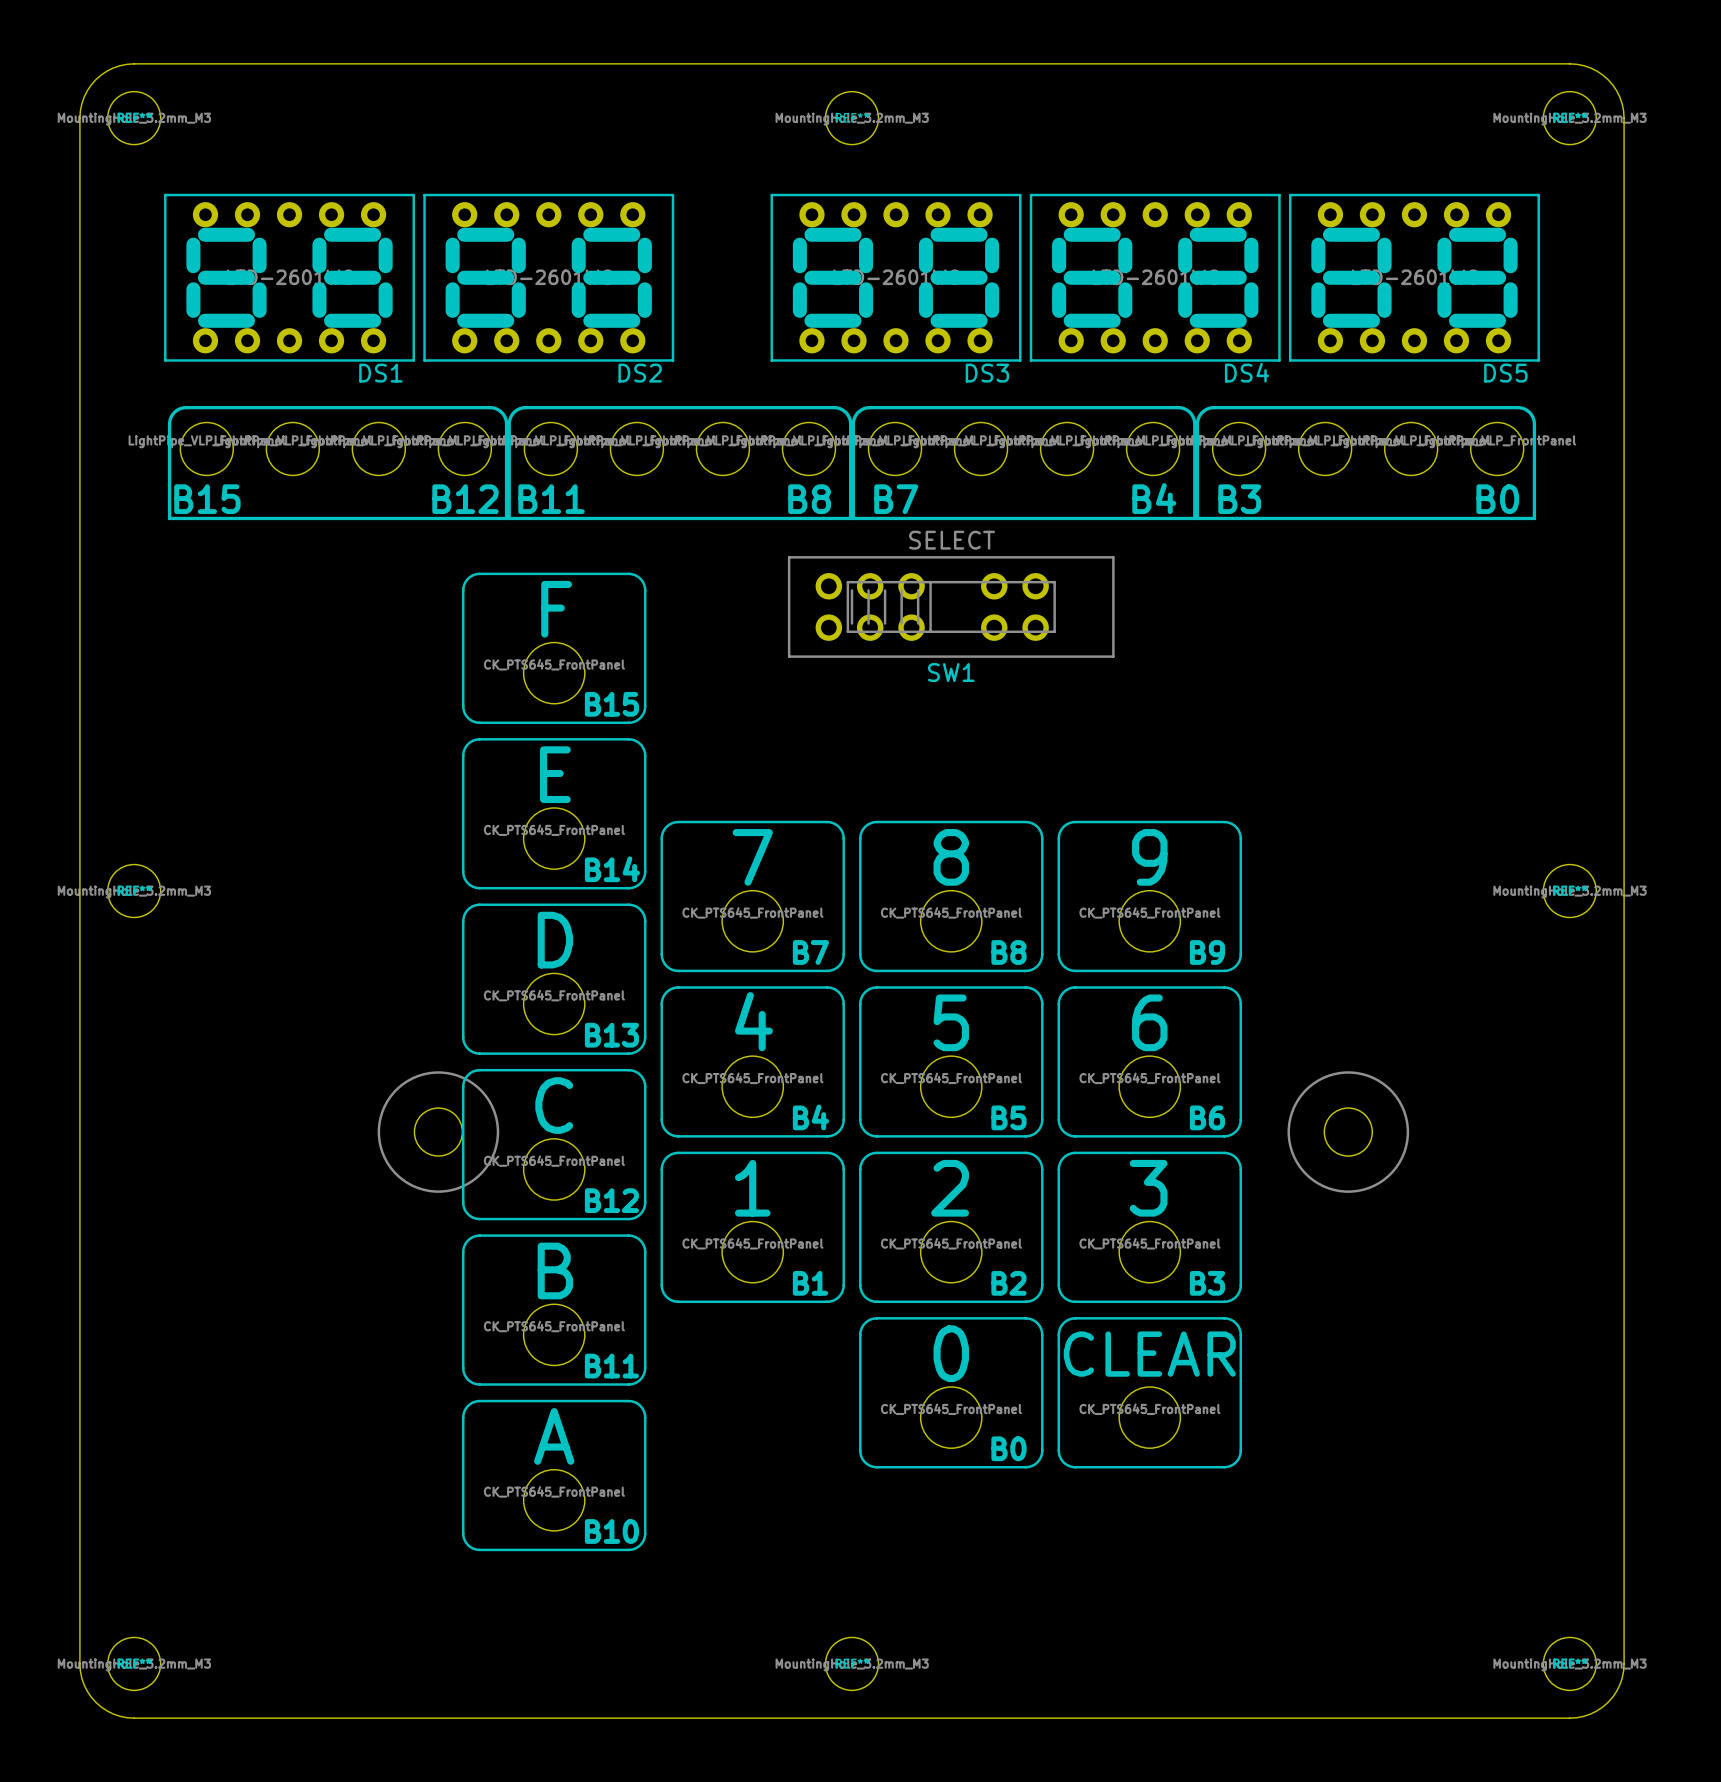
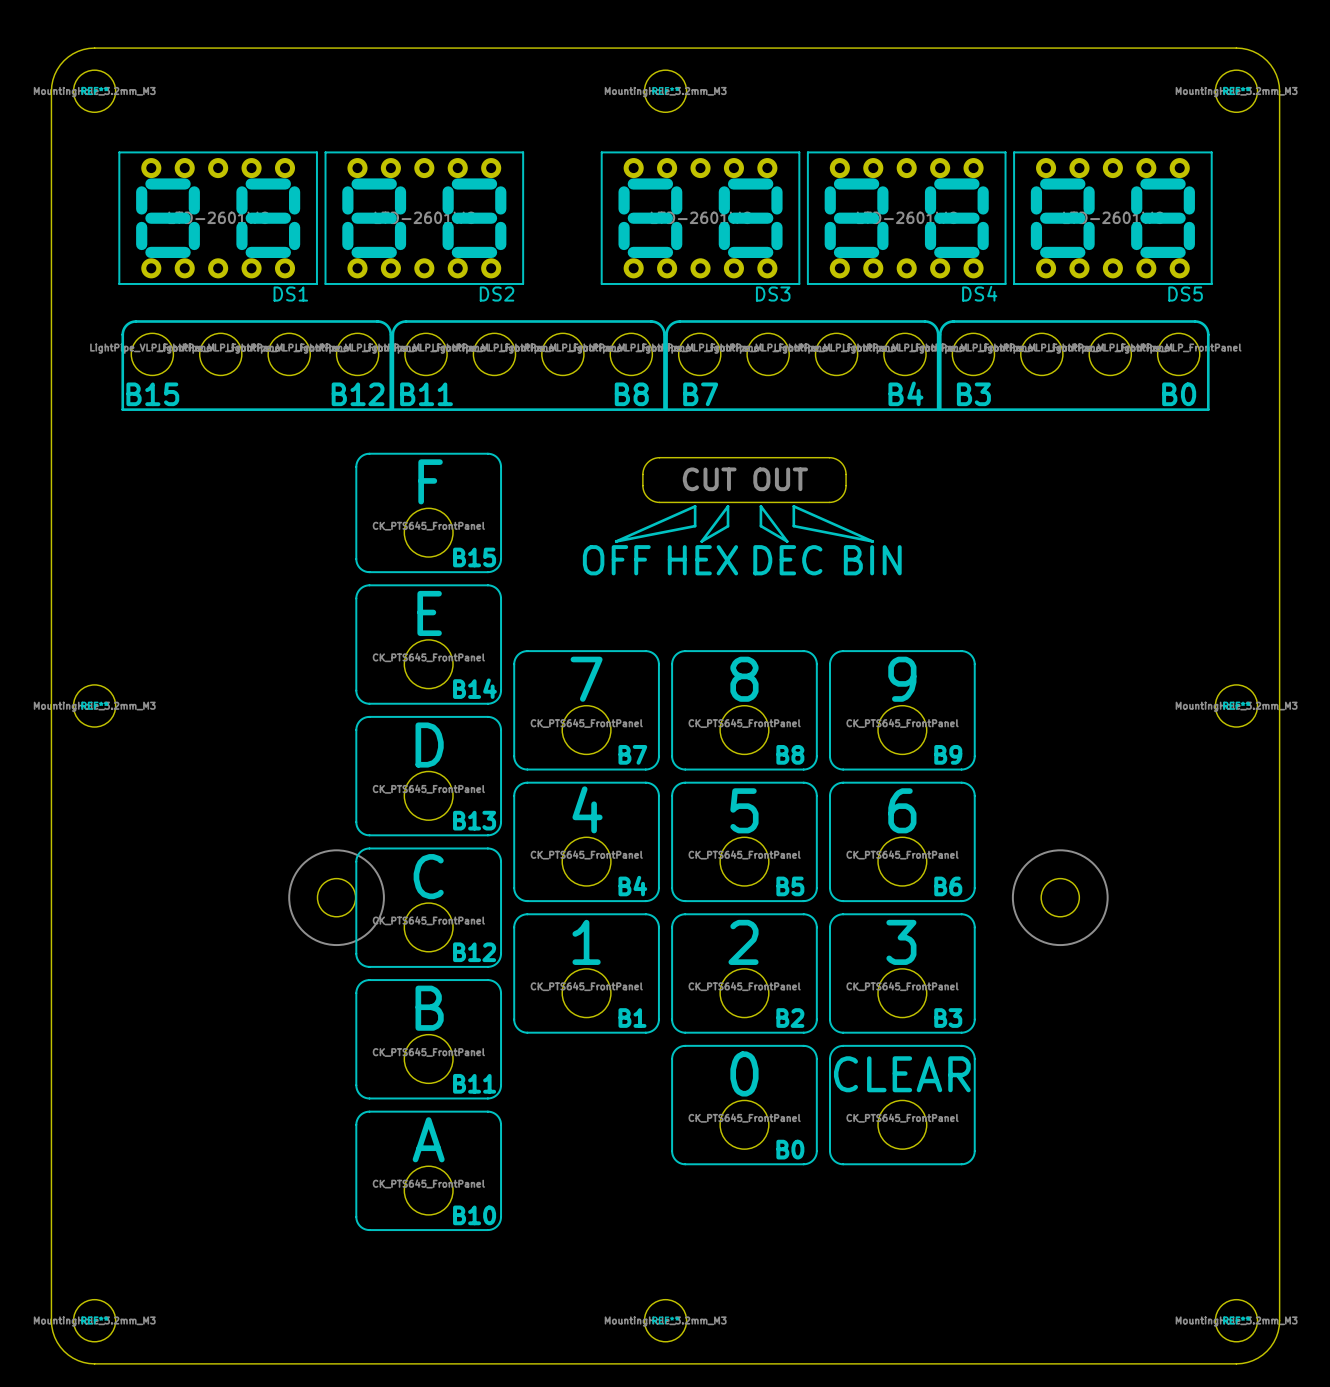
board edge: none -> (642, 474) (646, 464) (657, 457) (829, 457) (841, 462) (846, 474)
board edge: none -> (642, 474) (642, 485)
board edge: none -> (846, 474) (846, 485)
SW1: SELECT (951, 606) -> none
text: none -> CUT OUT (745, 479)
board edge: none -> (642, 485) (647, 497) (659, 502) (831, 502) (842, 495) (846, 485)
line: none -> (695, 506) (616, 541) (695, 526) (695, 506)
line: none -> (760, 506) (787, 541) (760, 526) (760, 506)
line: none -> (793, 506) (872, 541) (793, 526) (793, 506)
line: none -> (728, 526) (728, 506) (701, 541) (728, 526)
text: none -> OFF (616, 560)
text: none -> HEX (702, 560)
text: none -> DEC (787, 560)
text: none -> BIN (872, 560)

